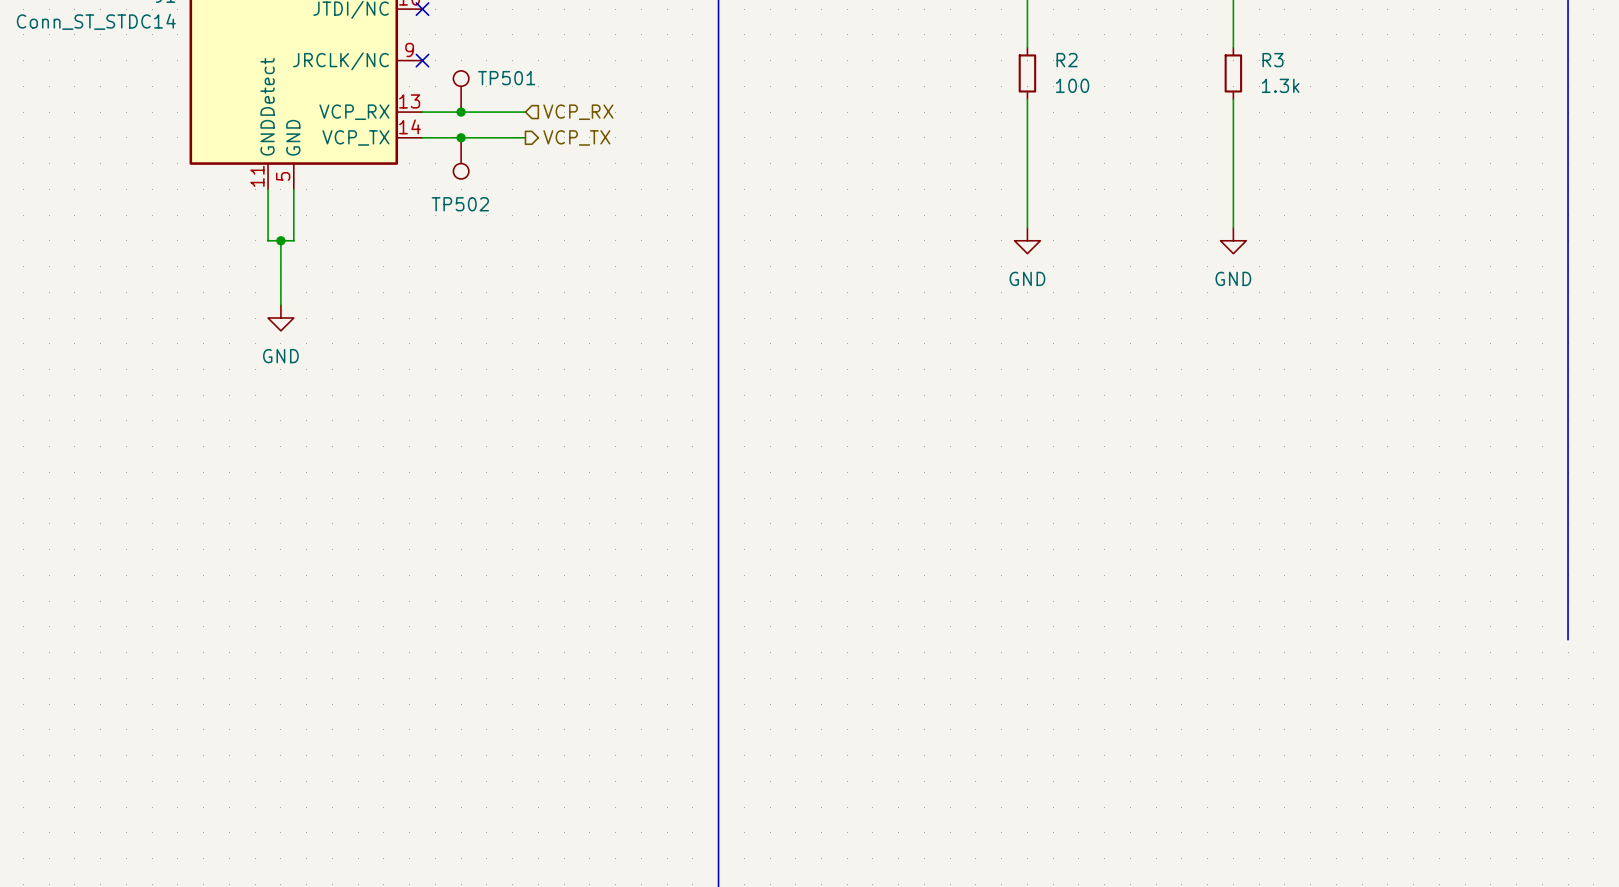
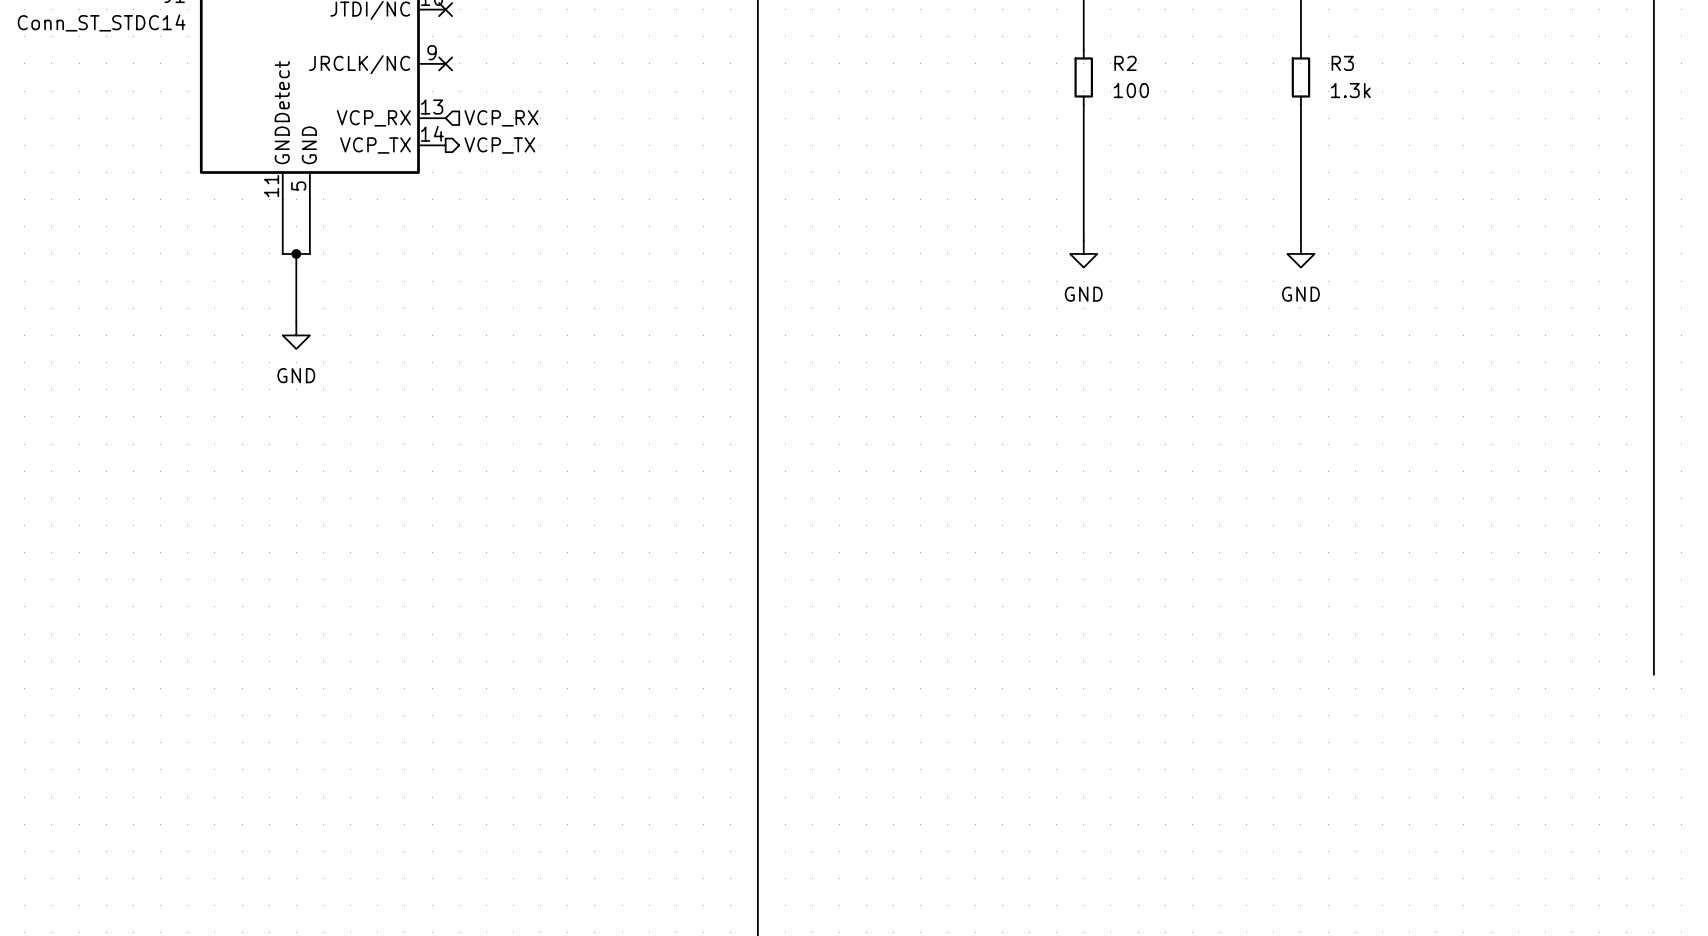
TP501: (461, 91) -> none
wire: (422, 112) (525, 112) -> none
junction: (461, 112) -> none
hierarchical label position: VCP_RX (578, 112) -> VCP_RX (501, 118)
wire: (422, 137) (525, 137) -> none
junction: (461, 137) -> none
hierarchical label position: VCP_TX (576, 137) -> VCP_TX (499, 145)
TP502: (461, 158) -> none

